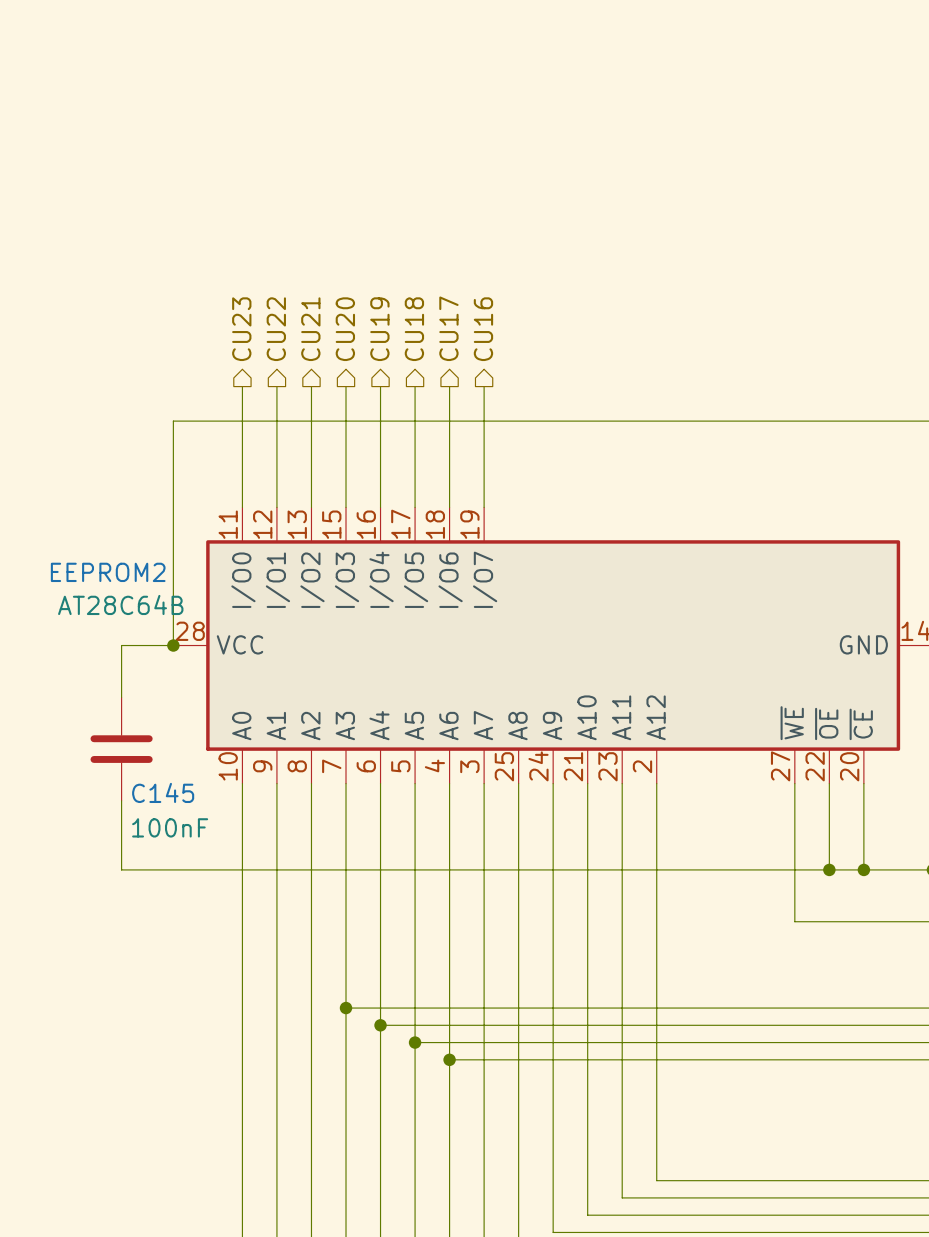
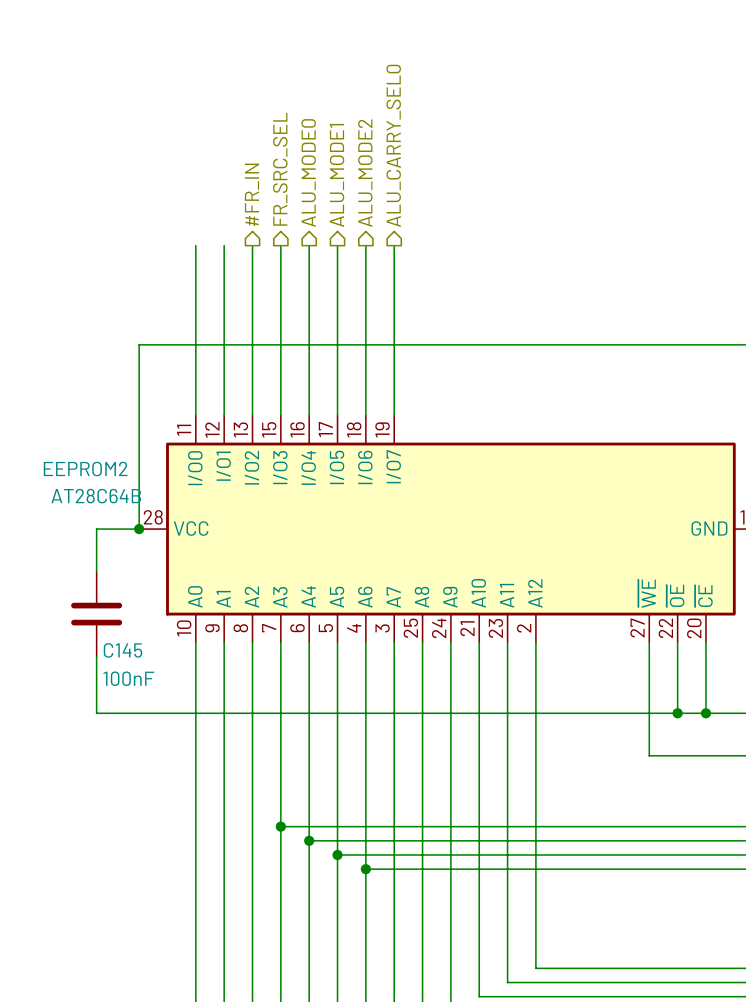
hierarchical label: none -> ALU_CARRY_SEL0 (393, 145)
hierarchical label: none -> FR_SRC_SEL (280, 169)
hierarchical label: none -> ALU_MODE0 (308, 173)
hierarchical label: none -> ALU_MODE1 (337, 175)
hierarchical label: none -> ALU_MODE2 (365, 173)
hierarchical label: none -> #FR_IN (251, 194)
wire: none -> (195, 245) (195, 316)
wire: none -> (224, 245) (224, 316)
wire: none -> (252, 245) (252, 316)
wire: none -> (280, 245) (280, 316)
wire: none -> (309, 245) (309, 316)
wire: none -> (337, 245) (337, 316)
wire: none -> (365, 245) (365, 316)
wire: none -> (394, 245) (394, 316)
hierarchical label: CU17 (448, 328) -> none
hierarchical label: CU23 (241, 329) -> none
hierarchical label: CU22 (276, 329) -> none
hierarchical label: CU21 (310, 329) -> none
hierarchical label: CU20 (345, 329) -> none
hierarchical label: CU19 (379, 329) -> none
hierarchical label: CU18 (414, 329) -> none
hierarchical label: CU16 (483, 329) -> none

